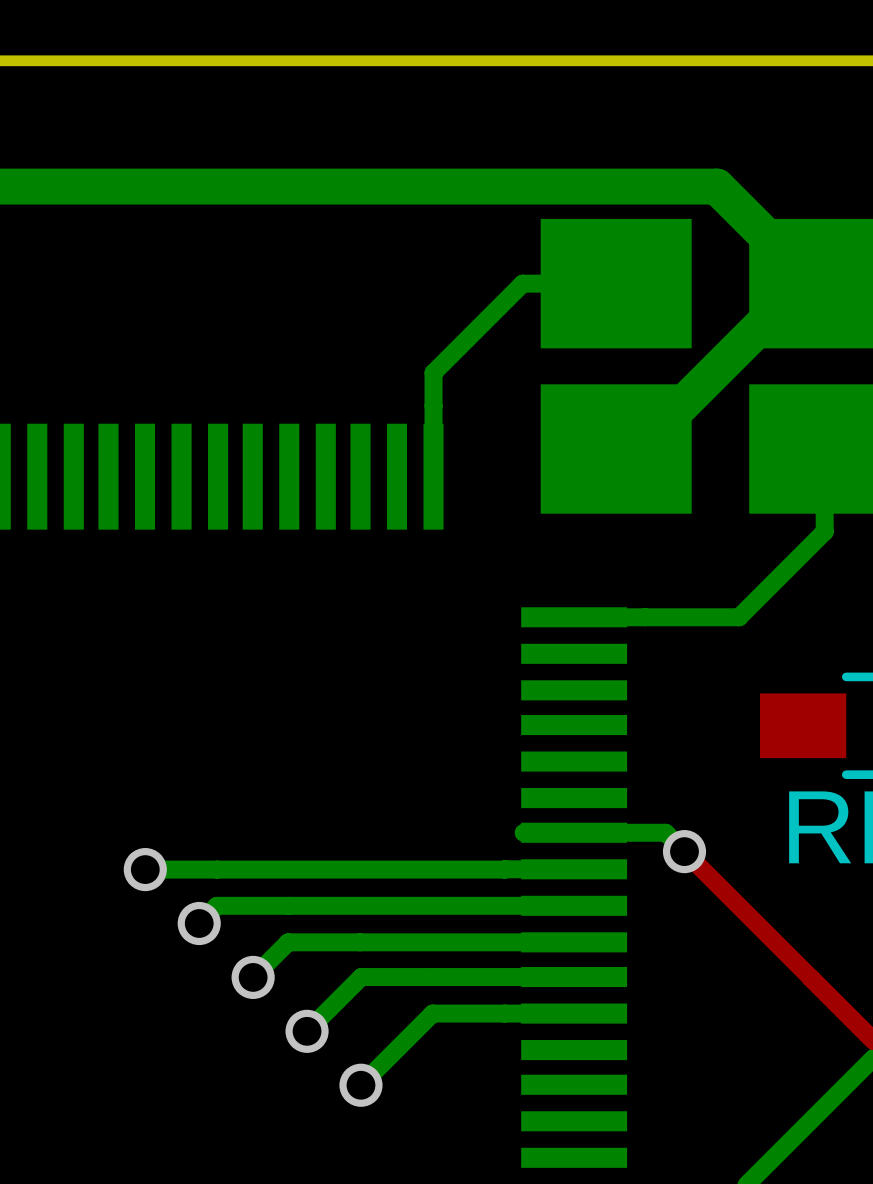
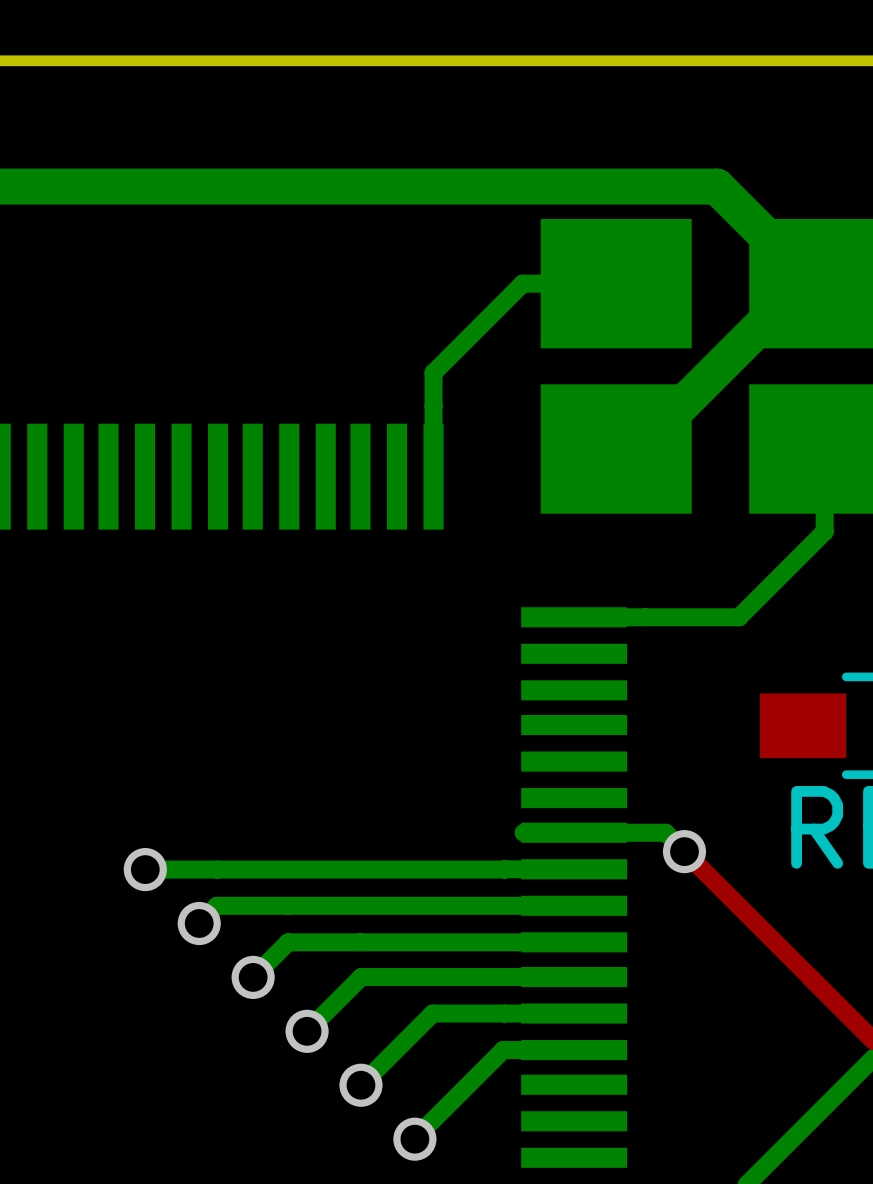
bottom track: none -> (574, 1050) (503, 1050) (414, 1138)
via: none -> (414, 1139)

